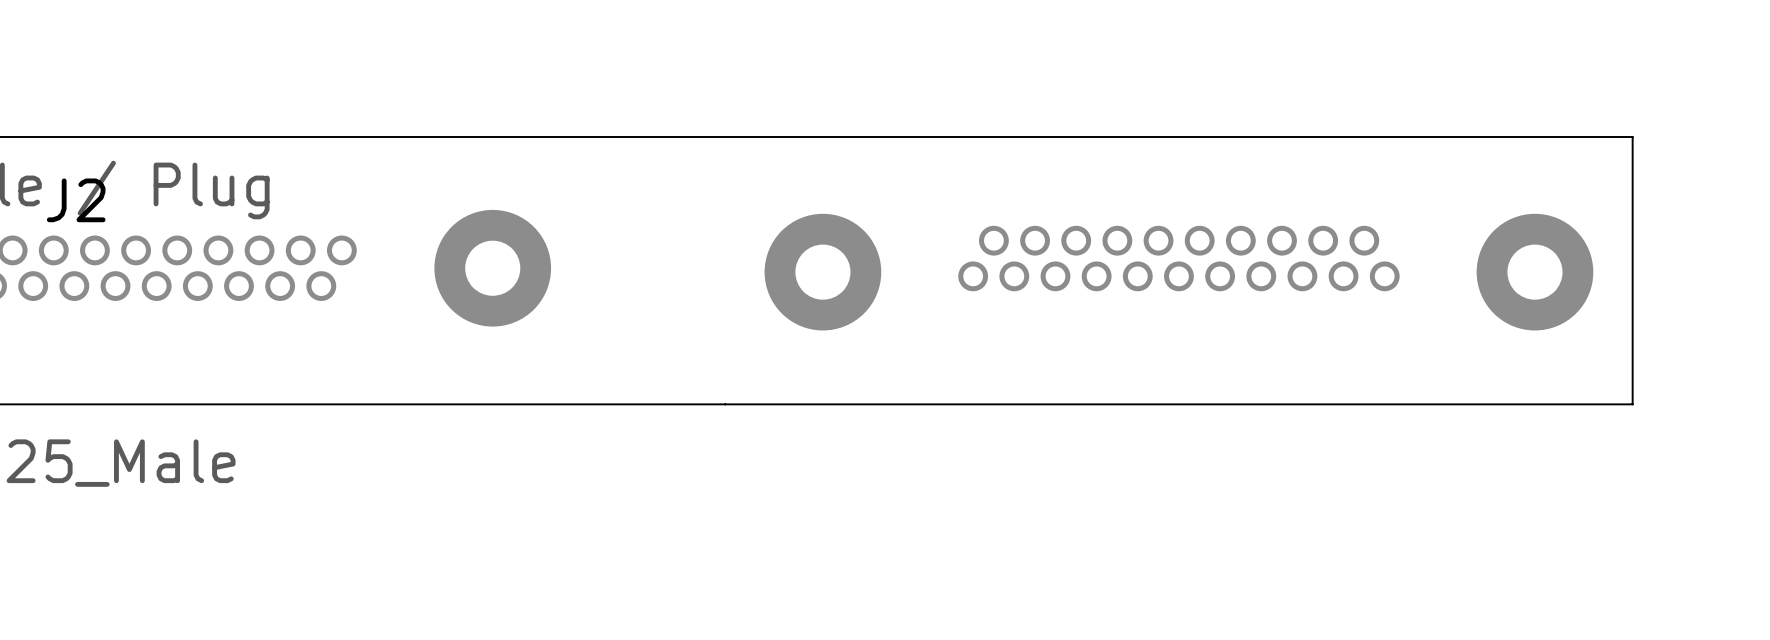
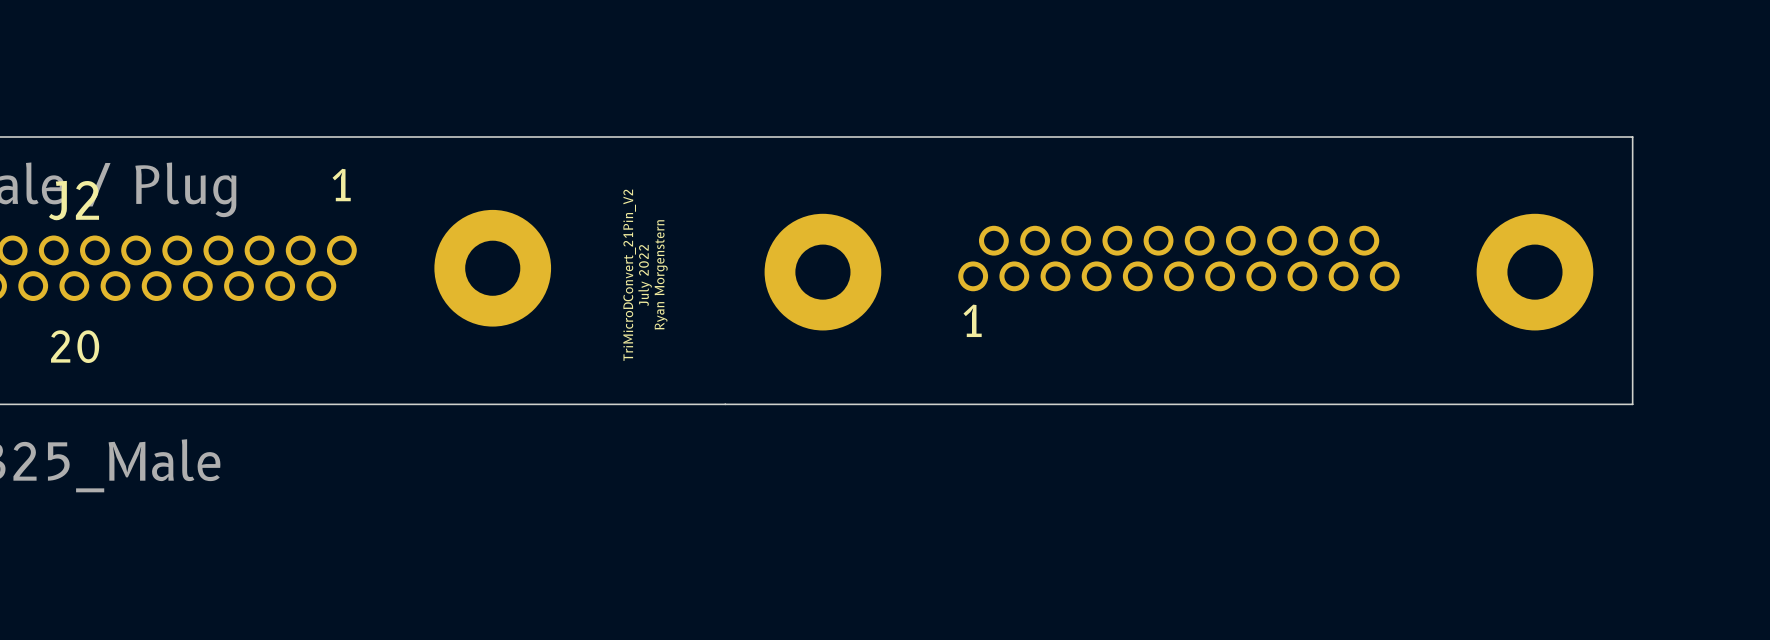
text: none -> 1 (341, 185)
text: none -> July 2022 (645, 275)
text: none -> Ryan Morgenstern (661, 274)
text: none -> TriMicroDConvert_21Pin_V2 (629, 275)
text: none -> 1 (972, 320)
text: none -> 20 (75, 346)

